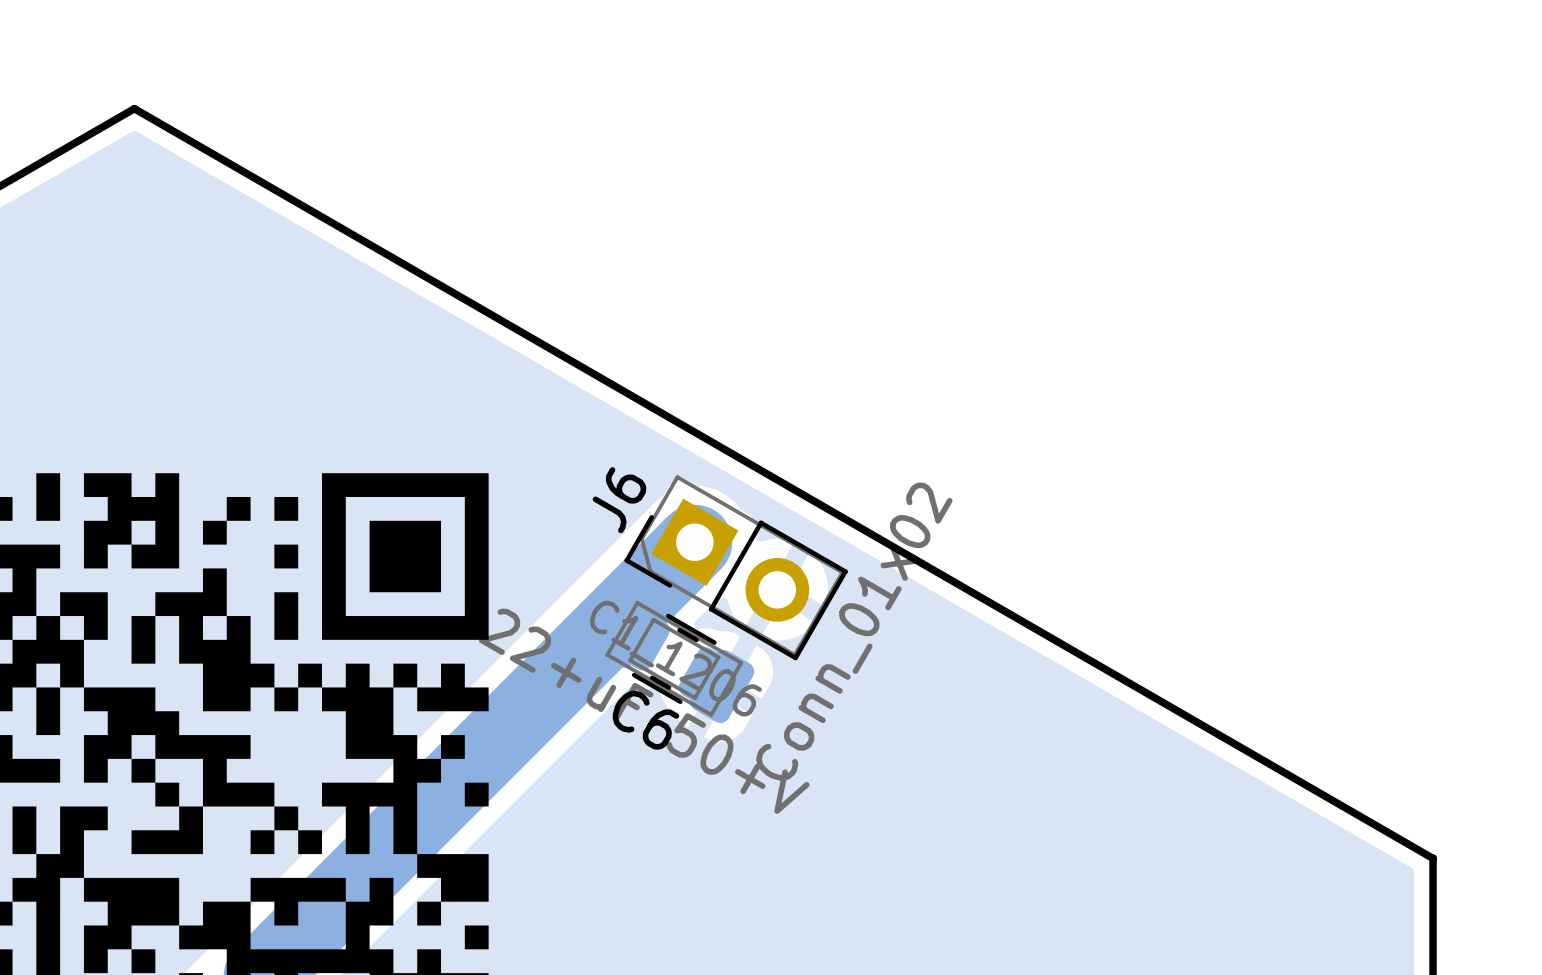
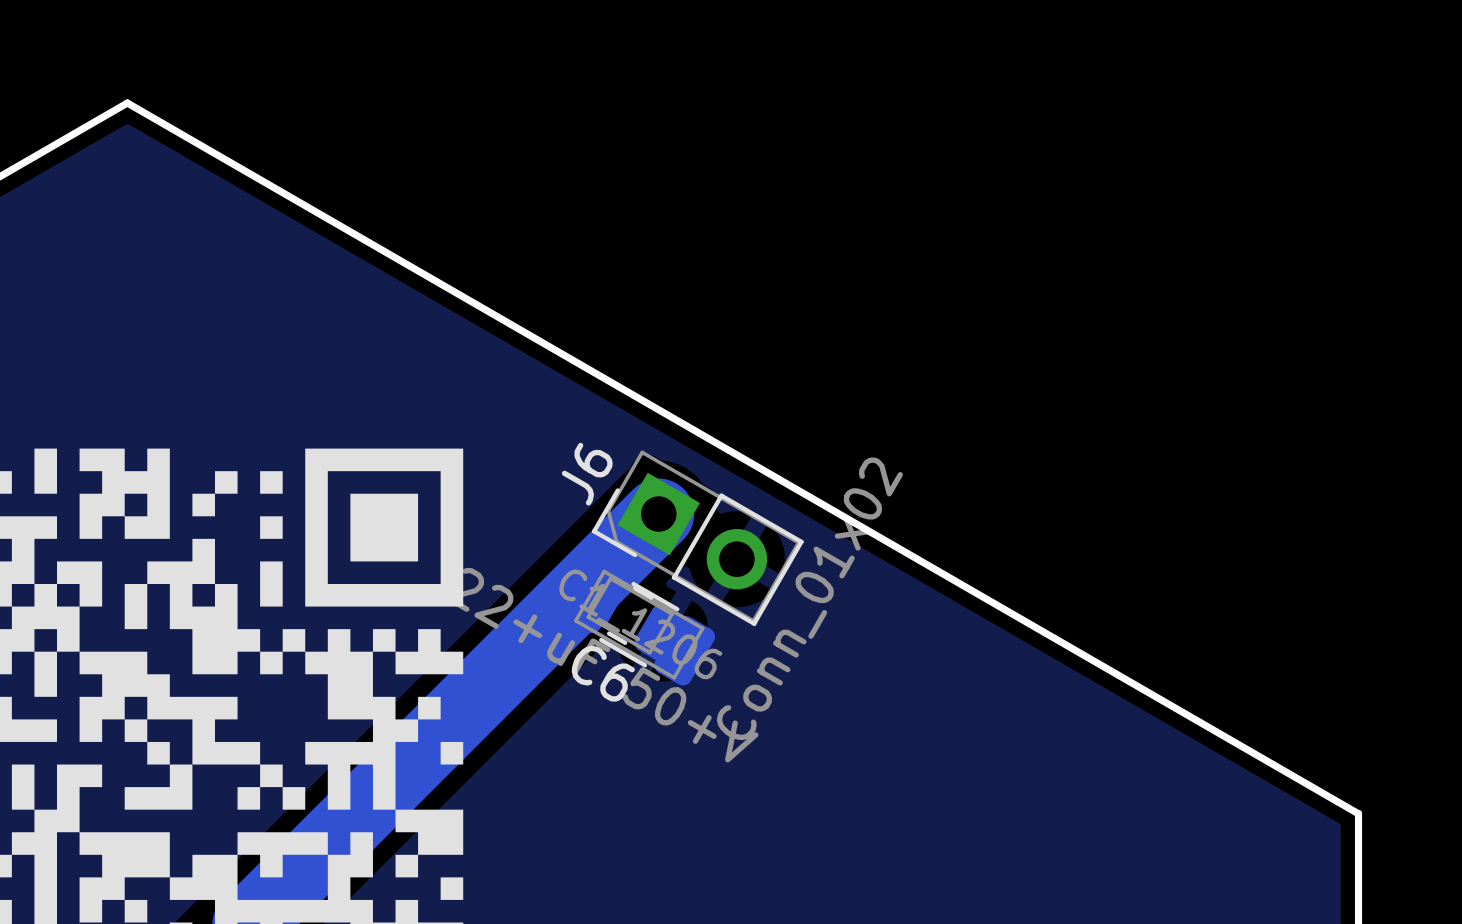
C6 position: (674, 658) -> (630, 615)

